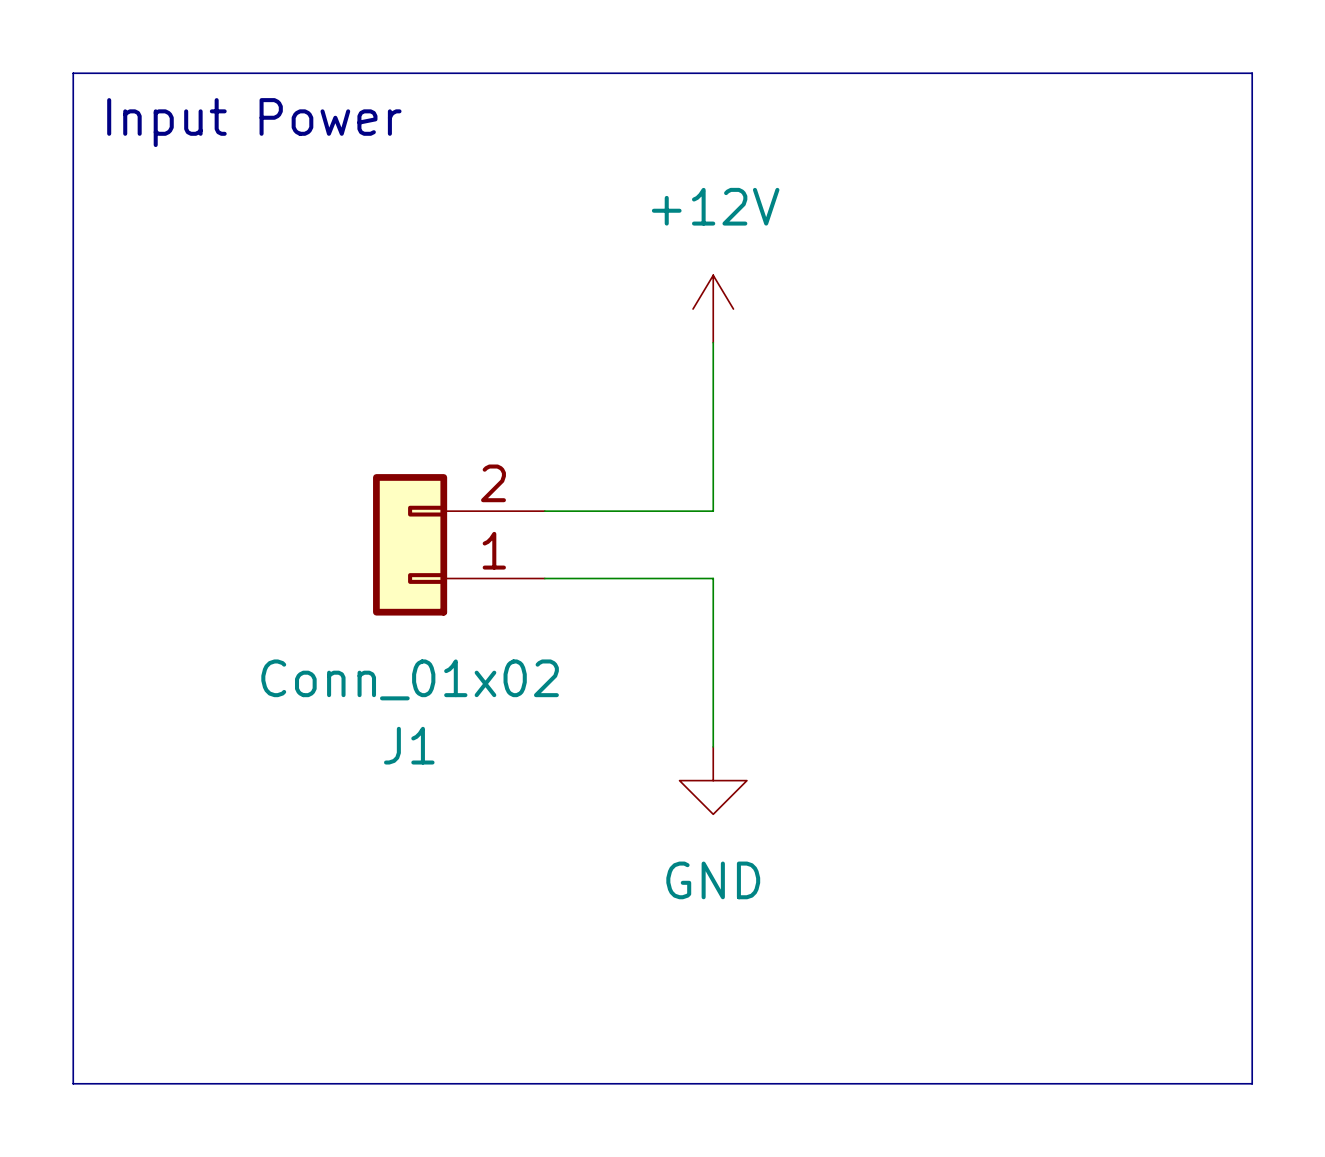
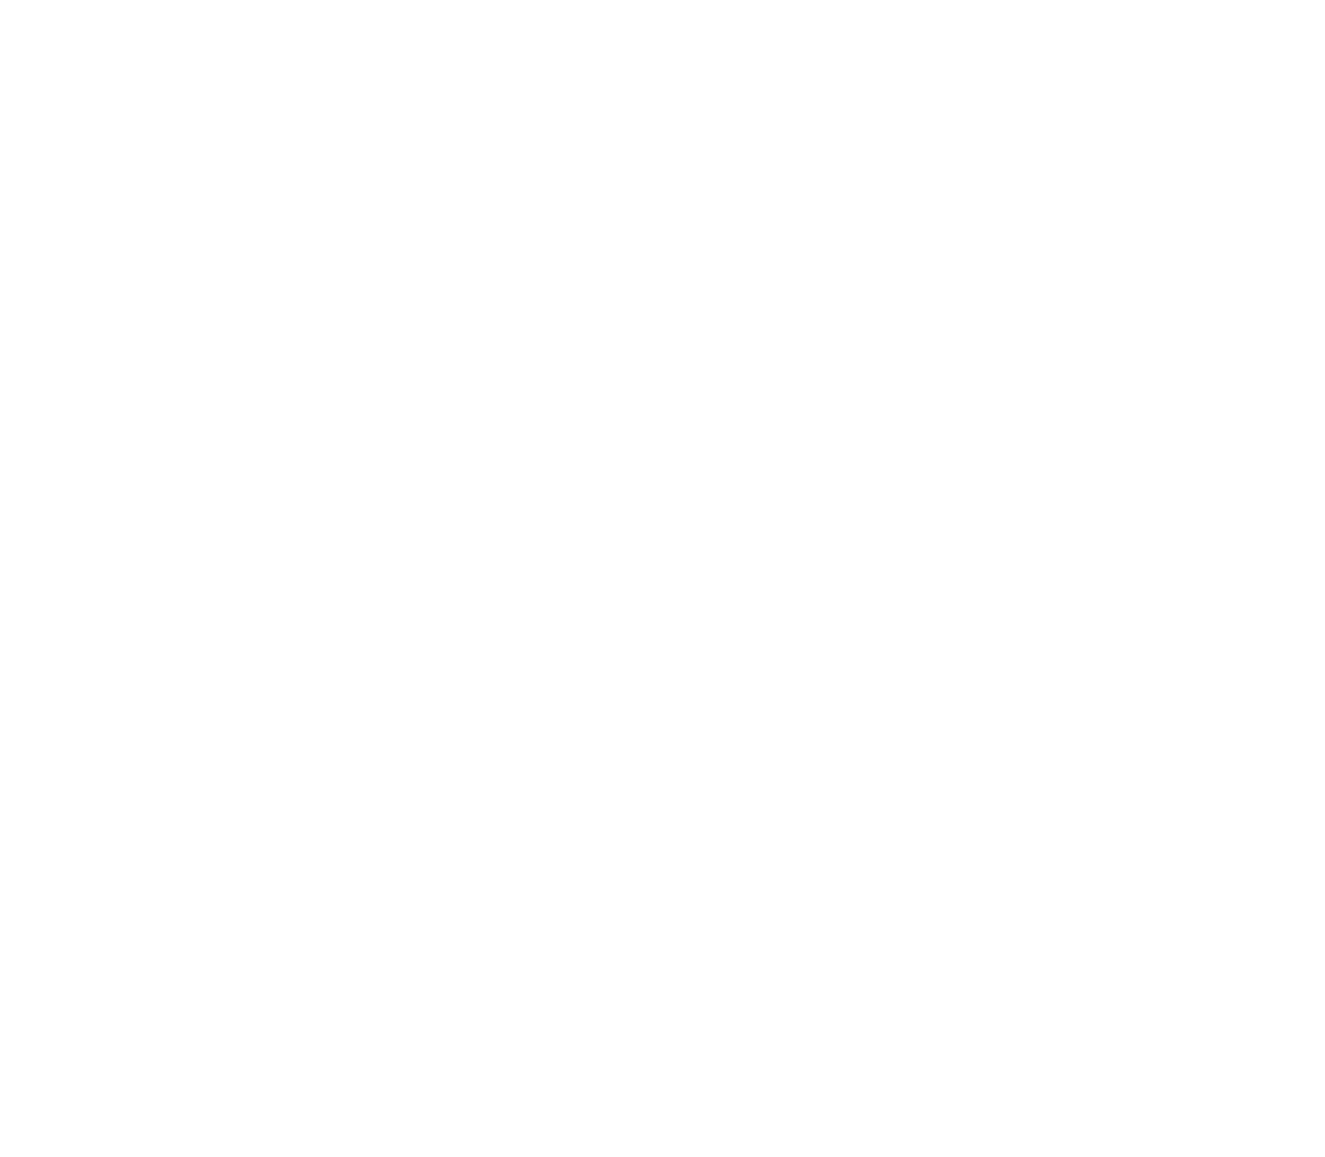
line: (73, 73) (1252, 73) (1252, 1083) (73, 1083) (73, 73) -> none
text: Input Power (254, 122) -> none
power symbol: +12V (713, 309) -> none
wire: (713, 342) (713, 511) (544, 511) -> none
J1: Conn_01x02 (458, 544) -> none
wire: (544, 578) (713, 578) (713, 746) -> none
power symbol: GND (713, 780) -> none

